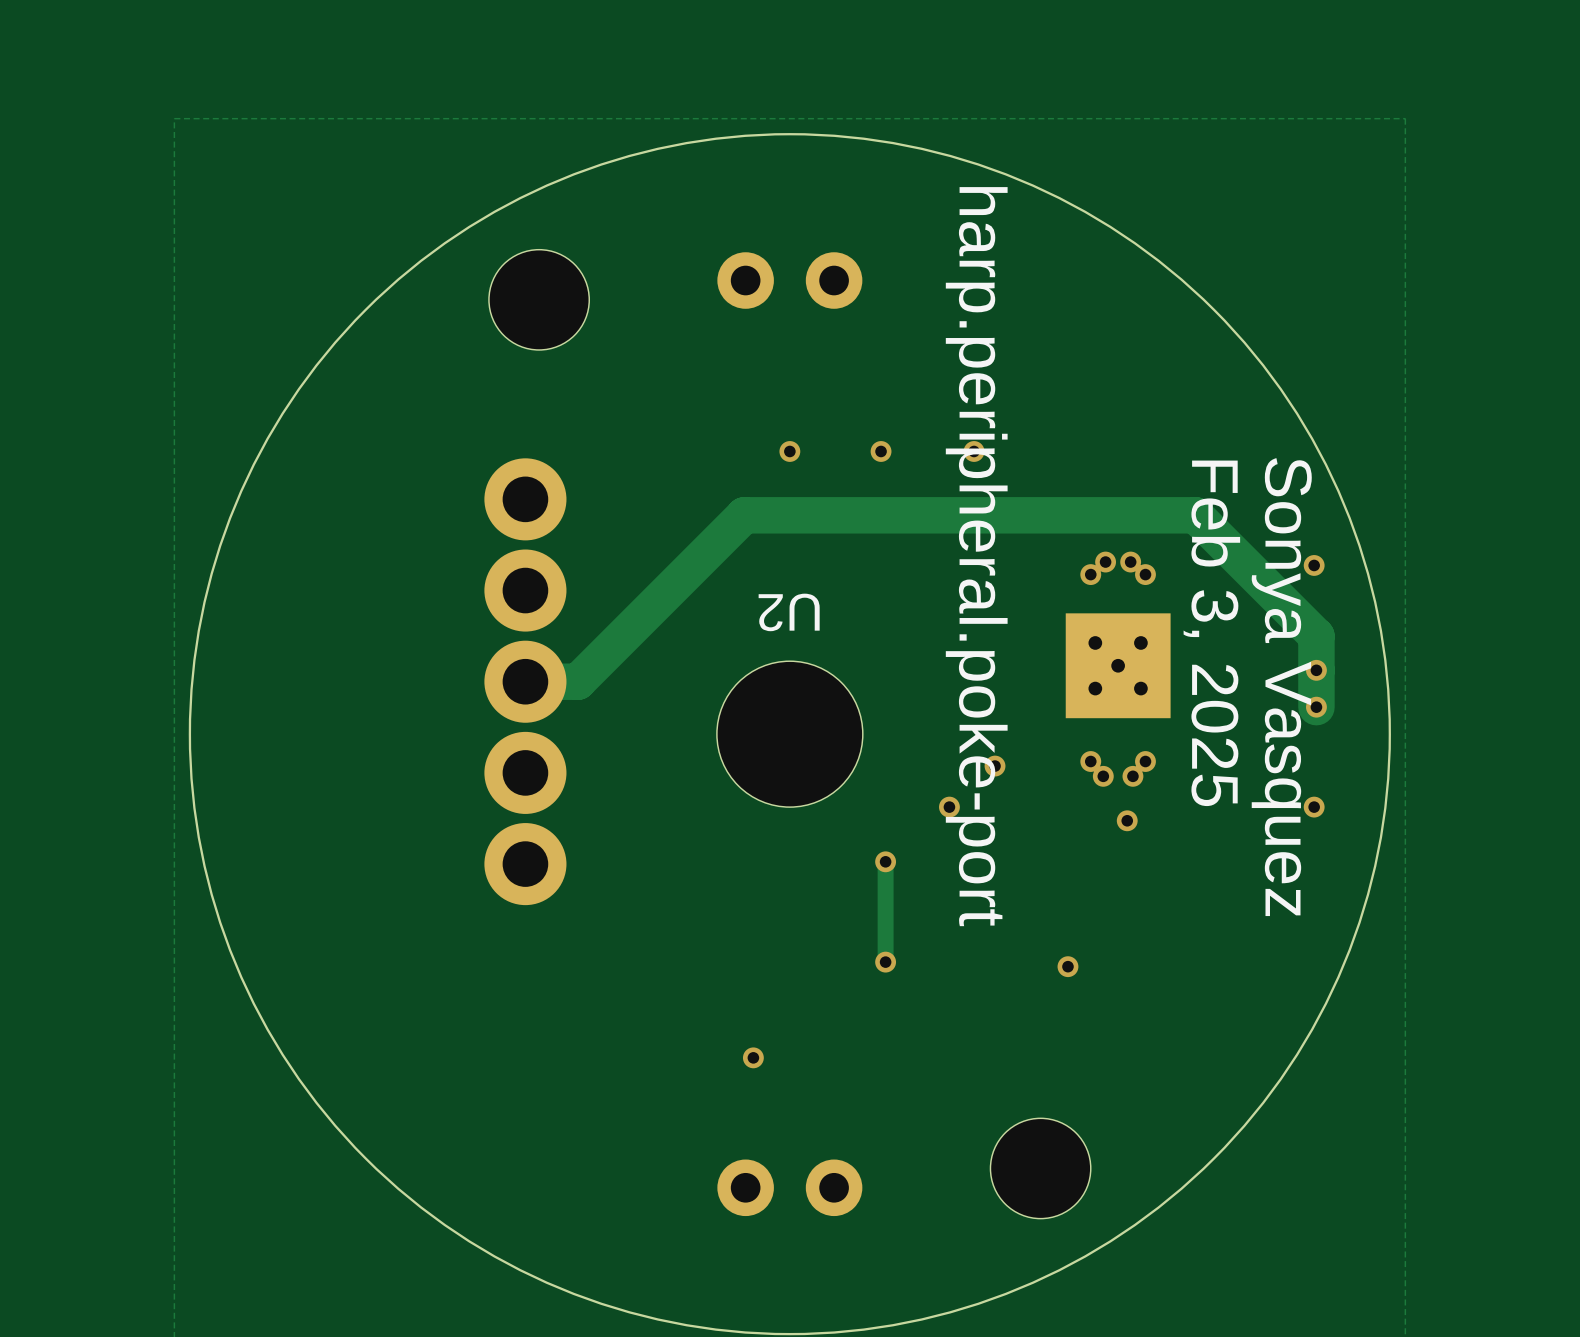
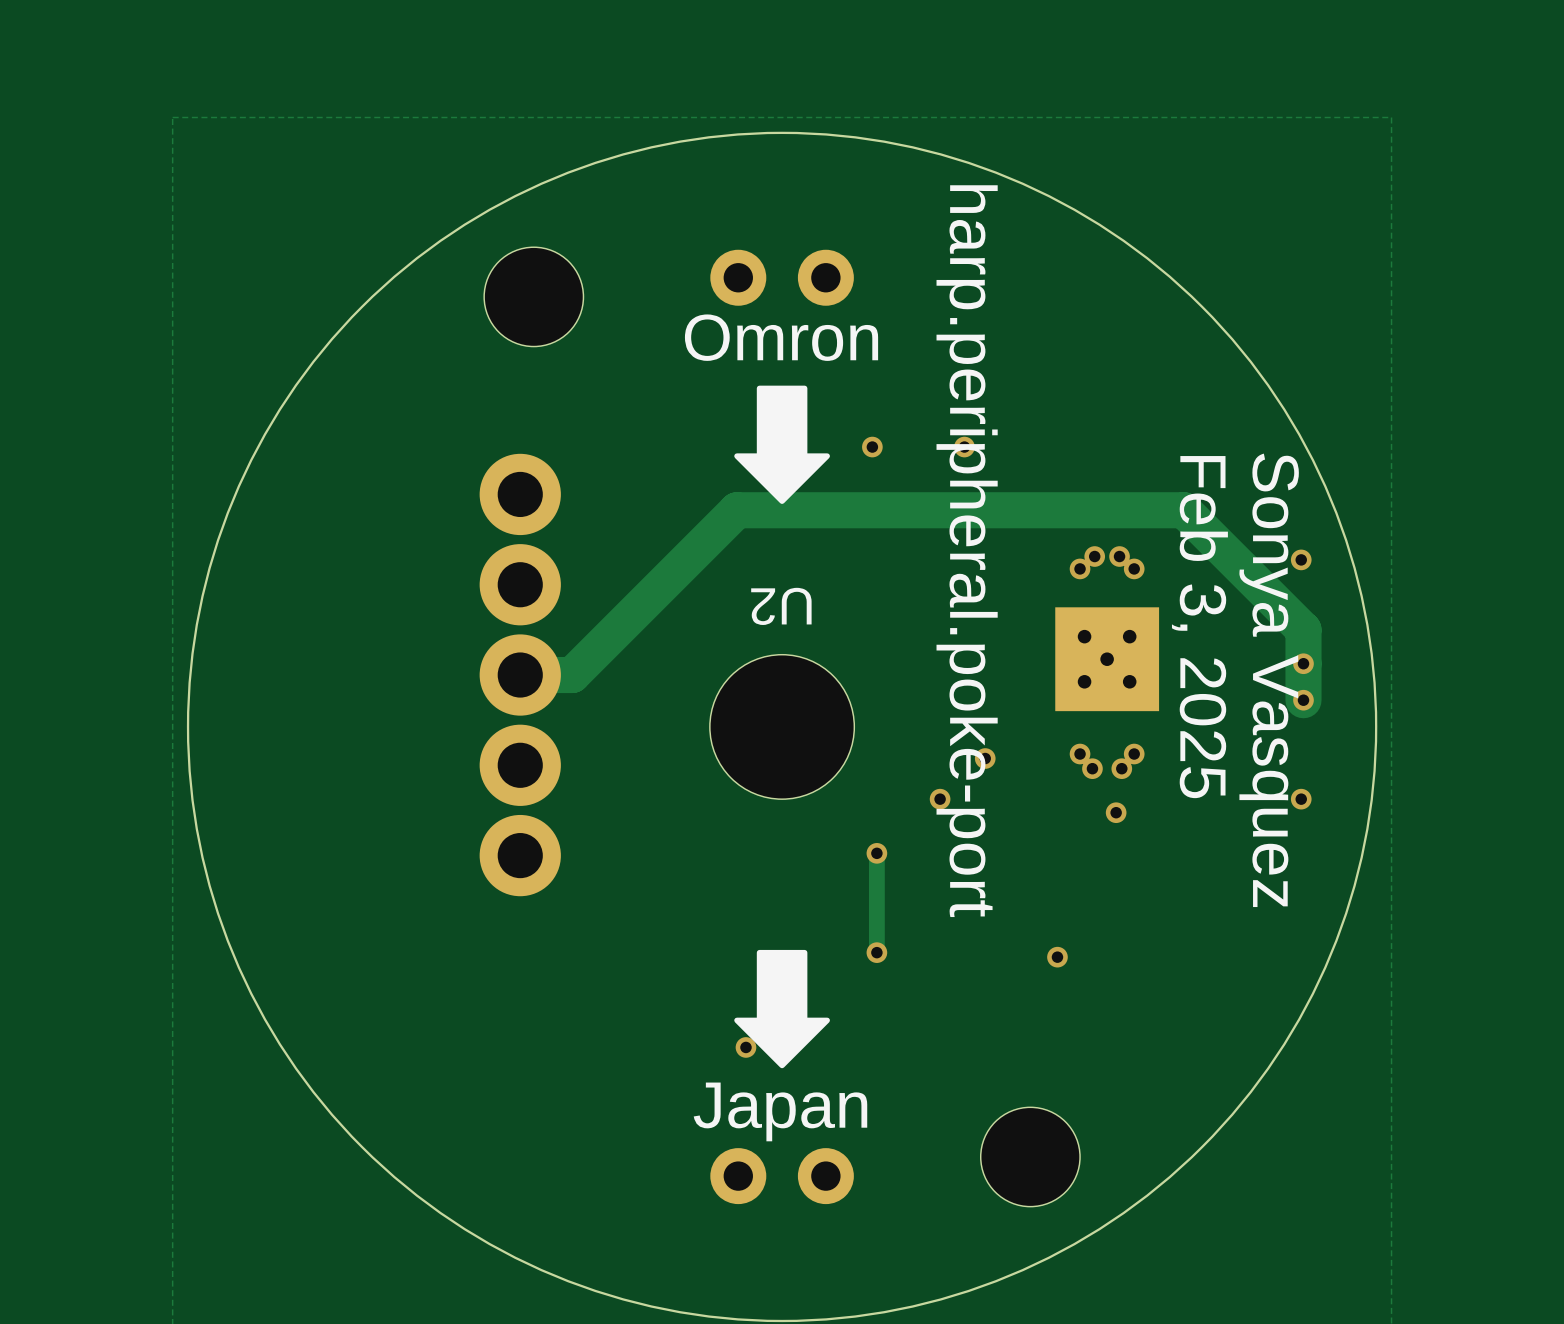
U2 footprint: [716, 252, 863, 1217] -> [709, 249, 855, 1205]

